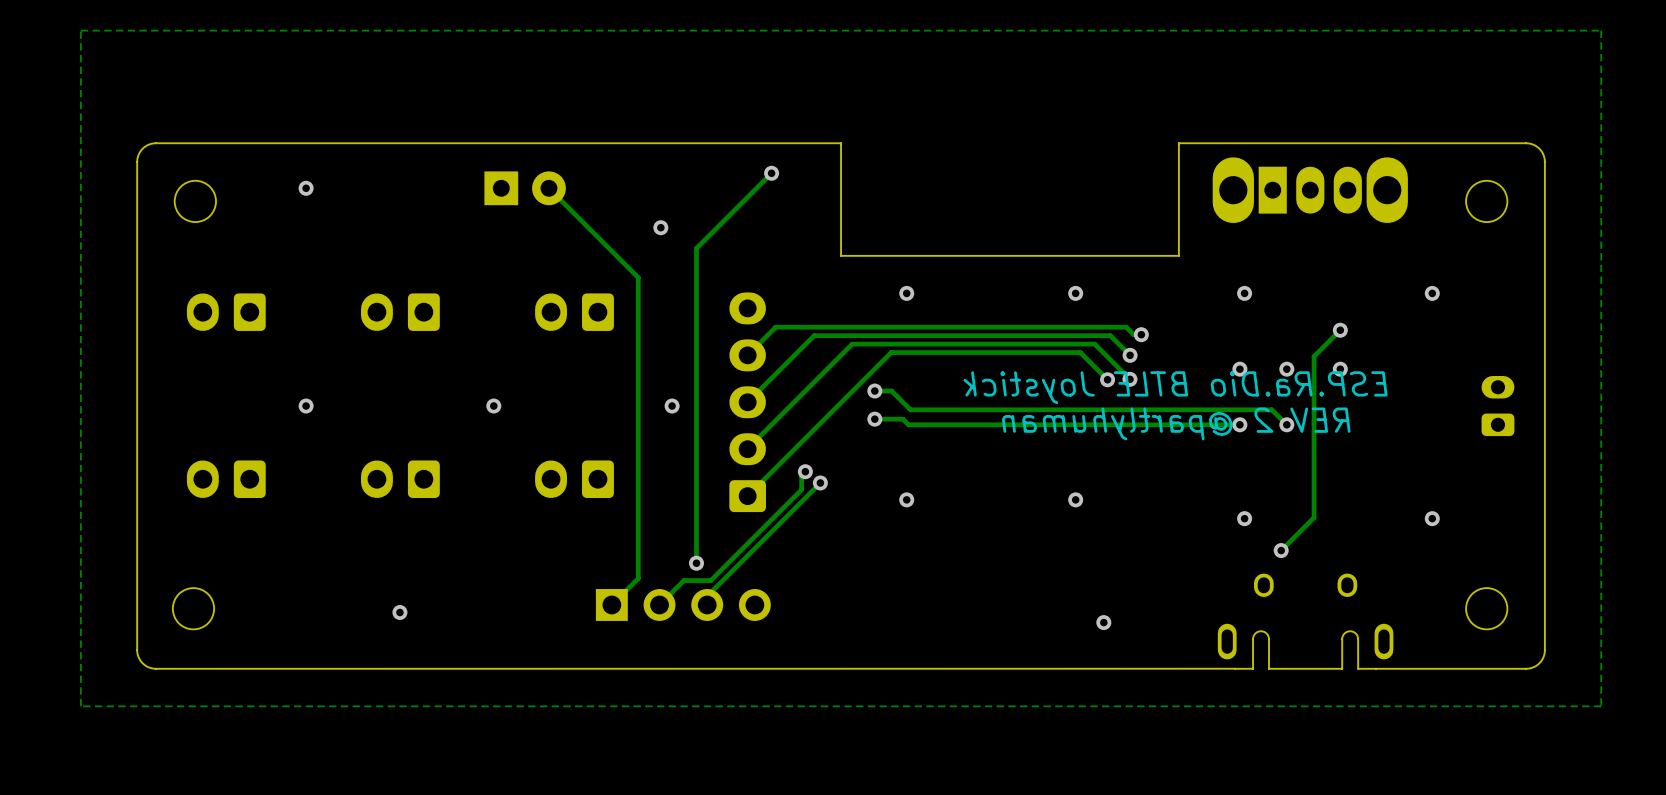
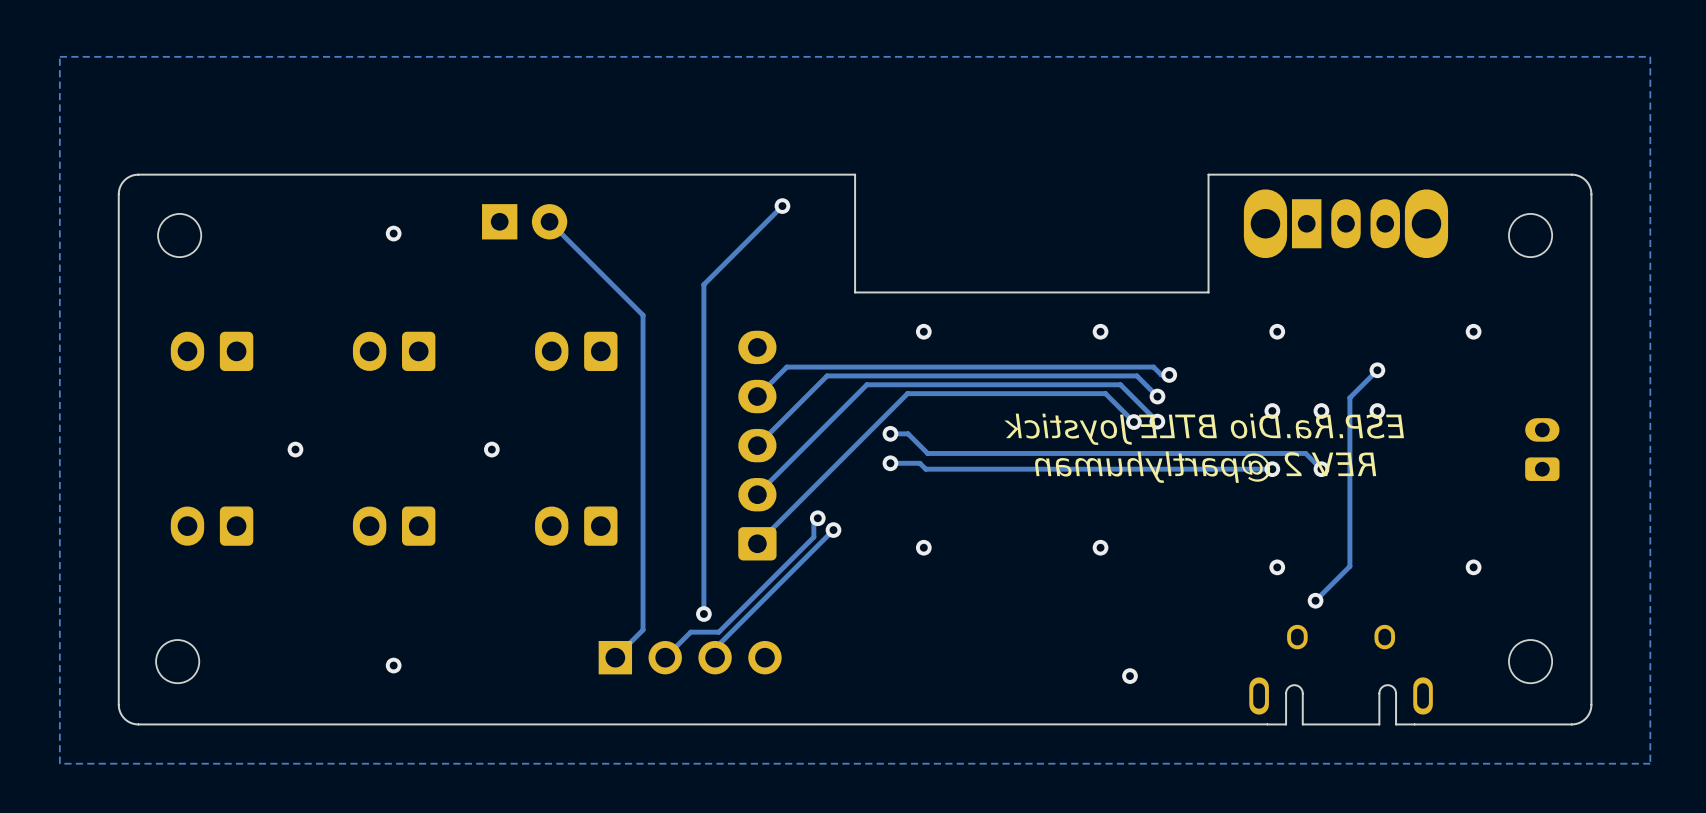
via position: (306, 188) -> (393, 233)
via: (660, 227) -> none
via: (672, 406) -> none

